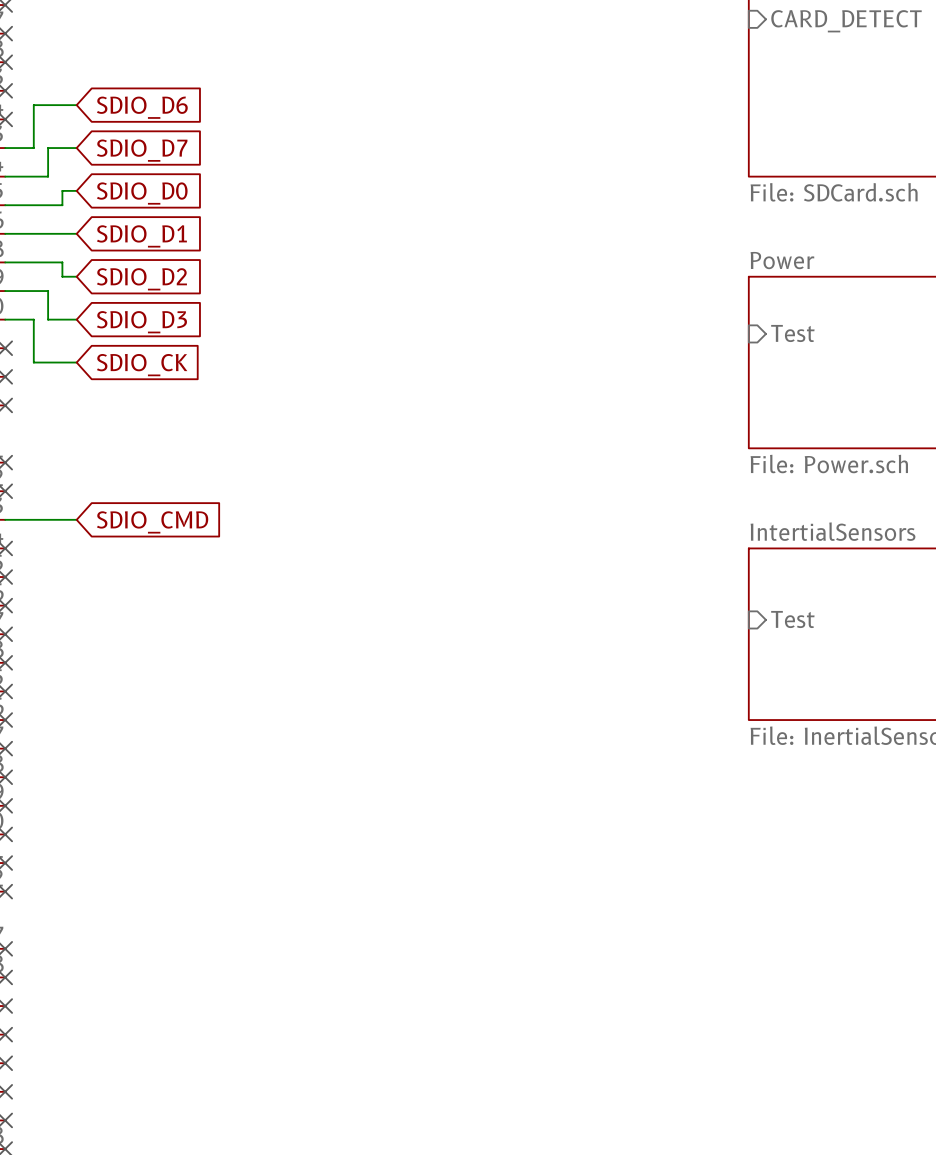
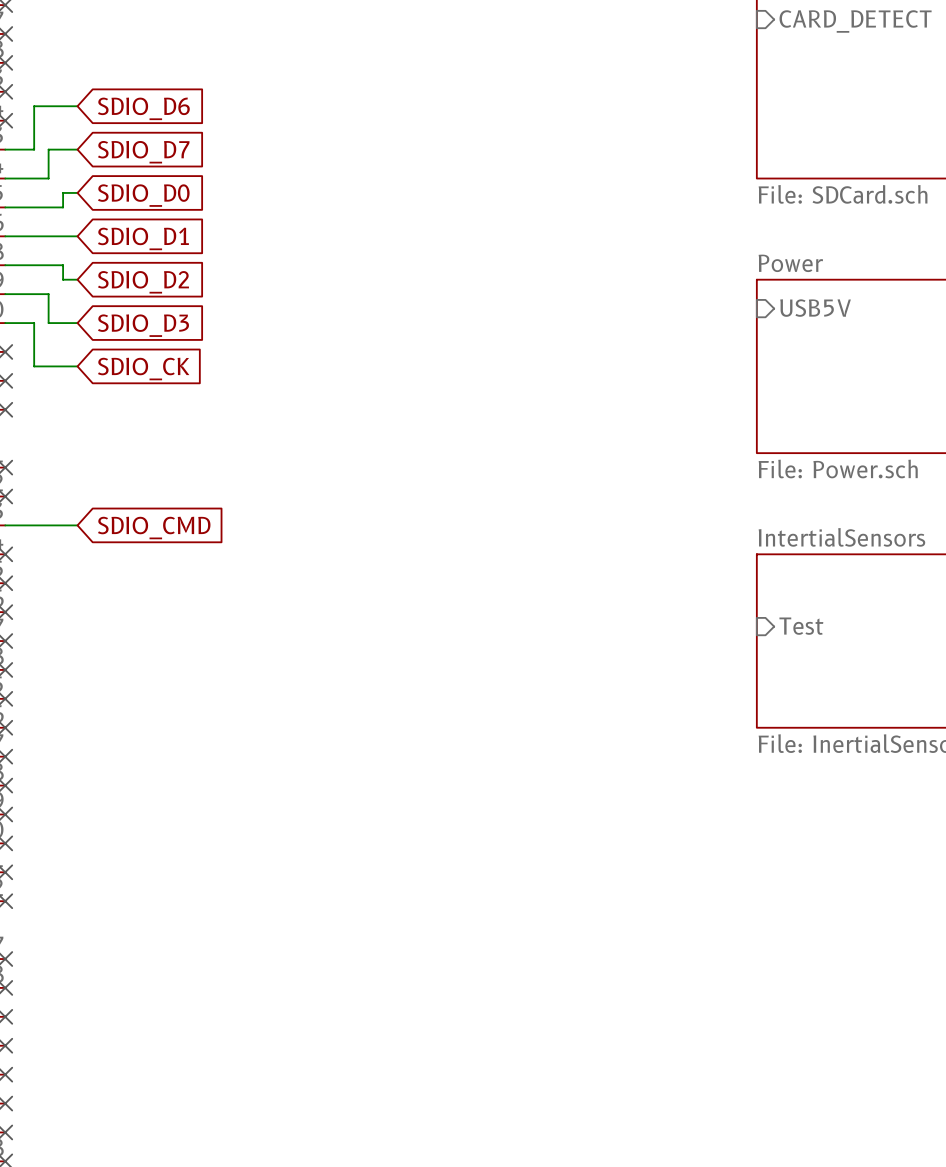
sheet pin: none -> USB5V (815, 308)
sheet pin: Test (792, 333) -> none

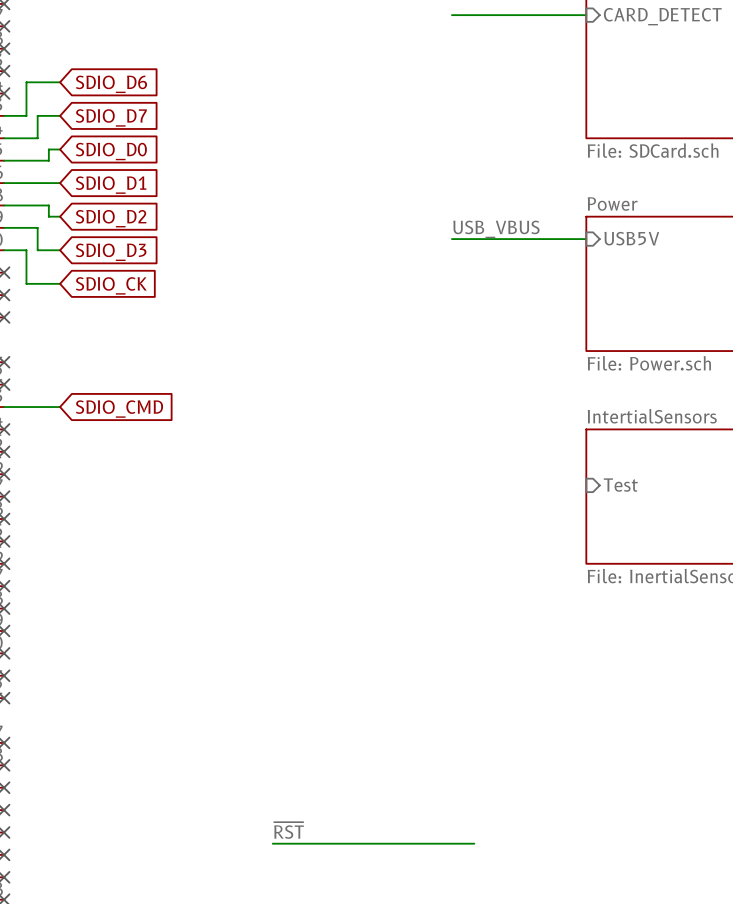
wire: none -> (451, 15) (586, 15)
label: none -> USB_VBUS (496, 229)
wire: none -> (451, 239) (586, 239)
label: none -> ~{RST} (289, 830)
wire: none -> (272, 843) (474, 843)

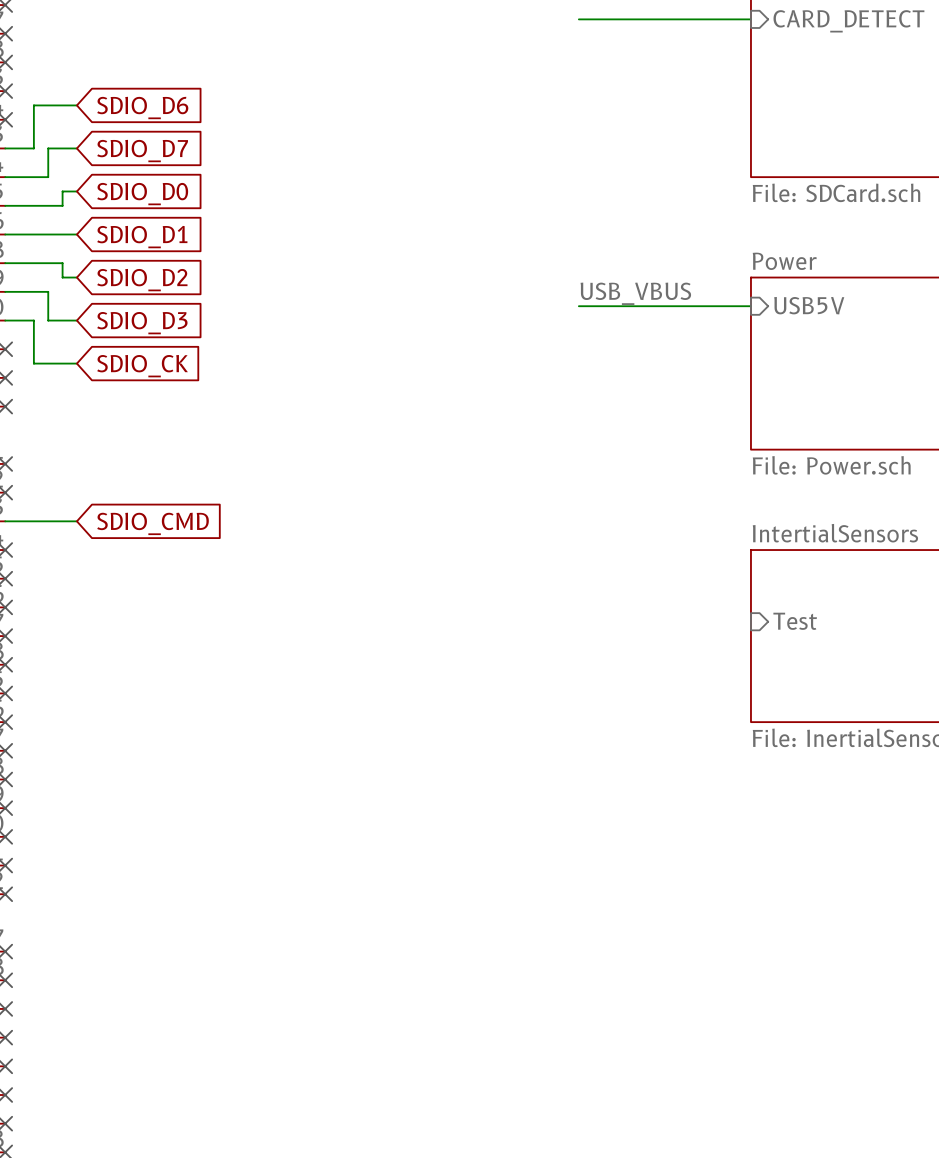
label: ~{RST} (289, 830) -> none
wire: (272, 843) (474, 843) -> none

